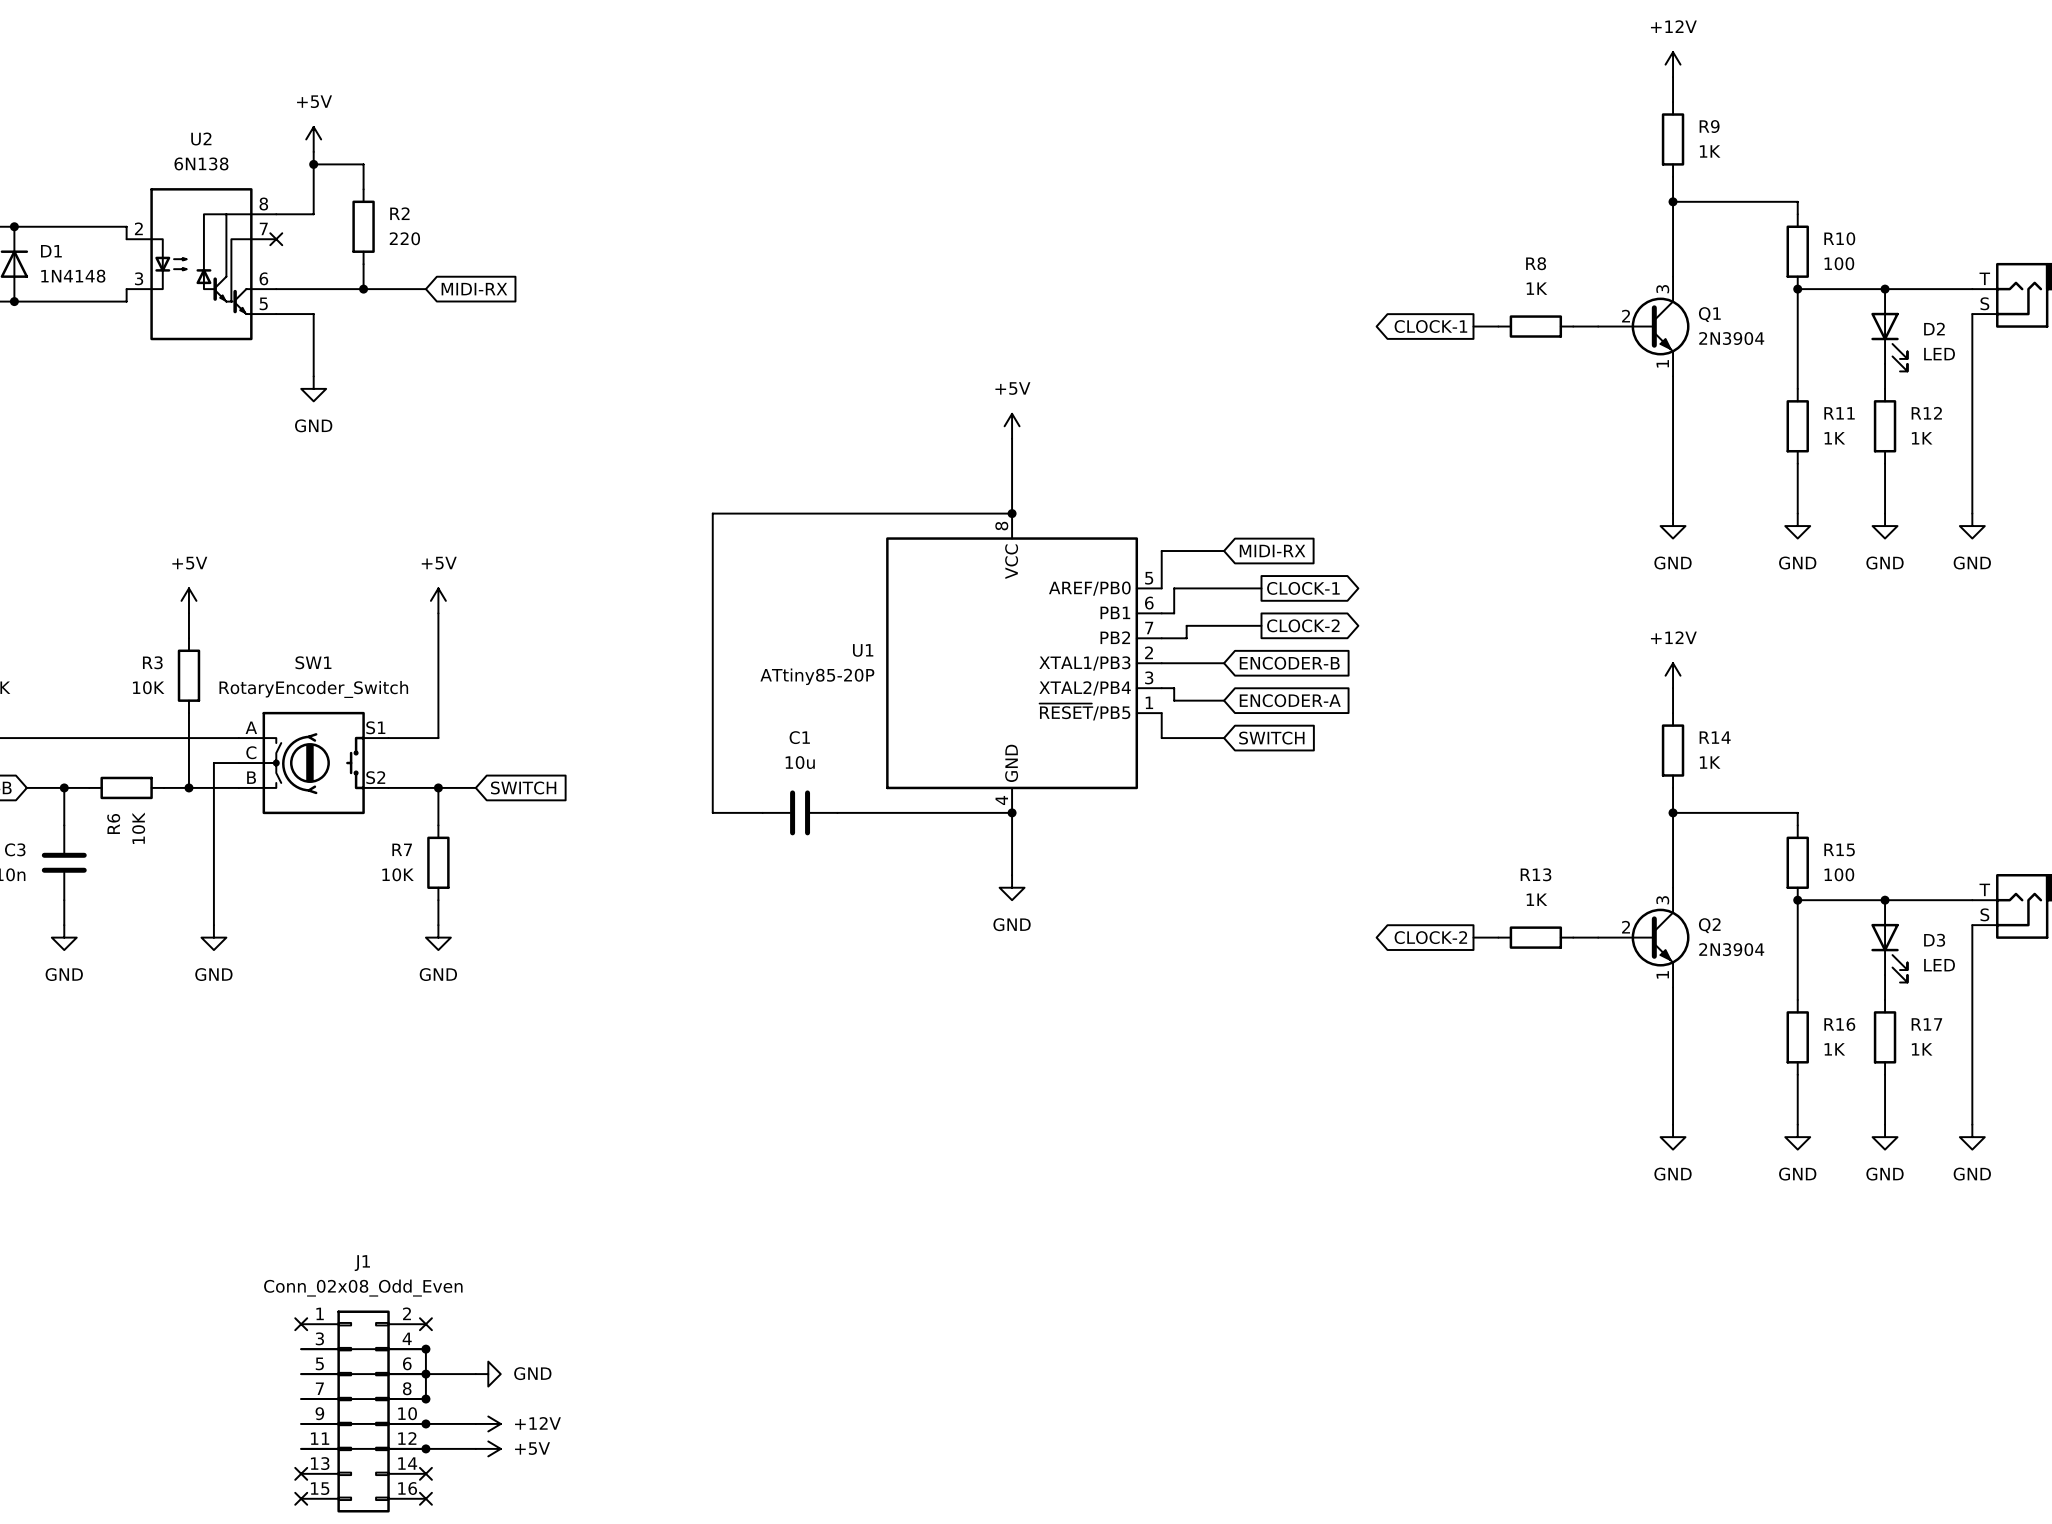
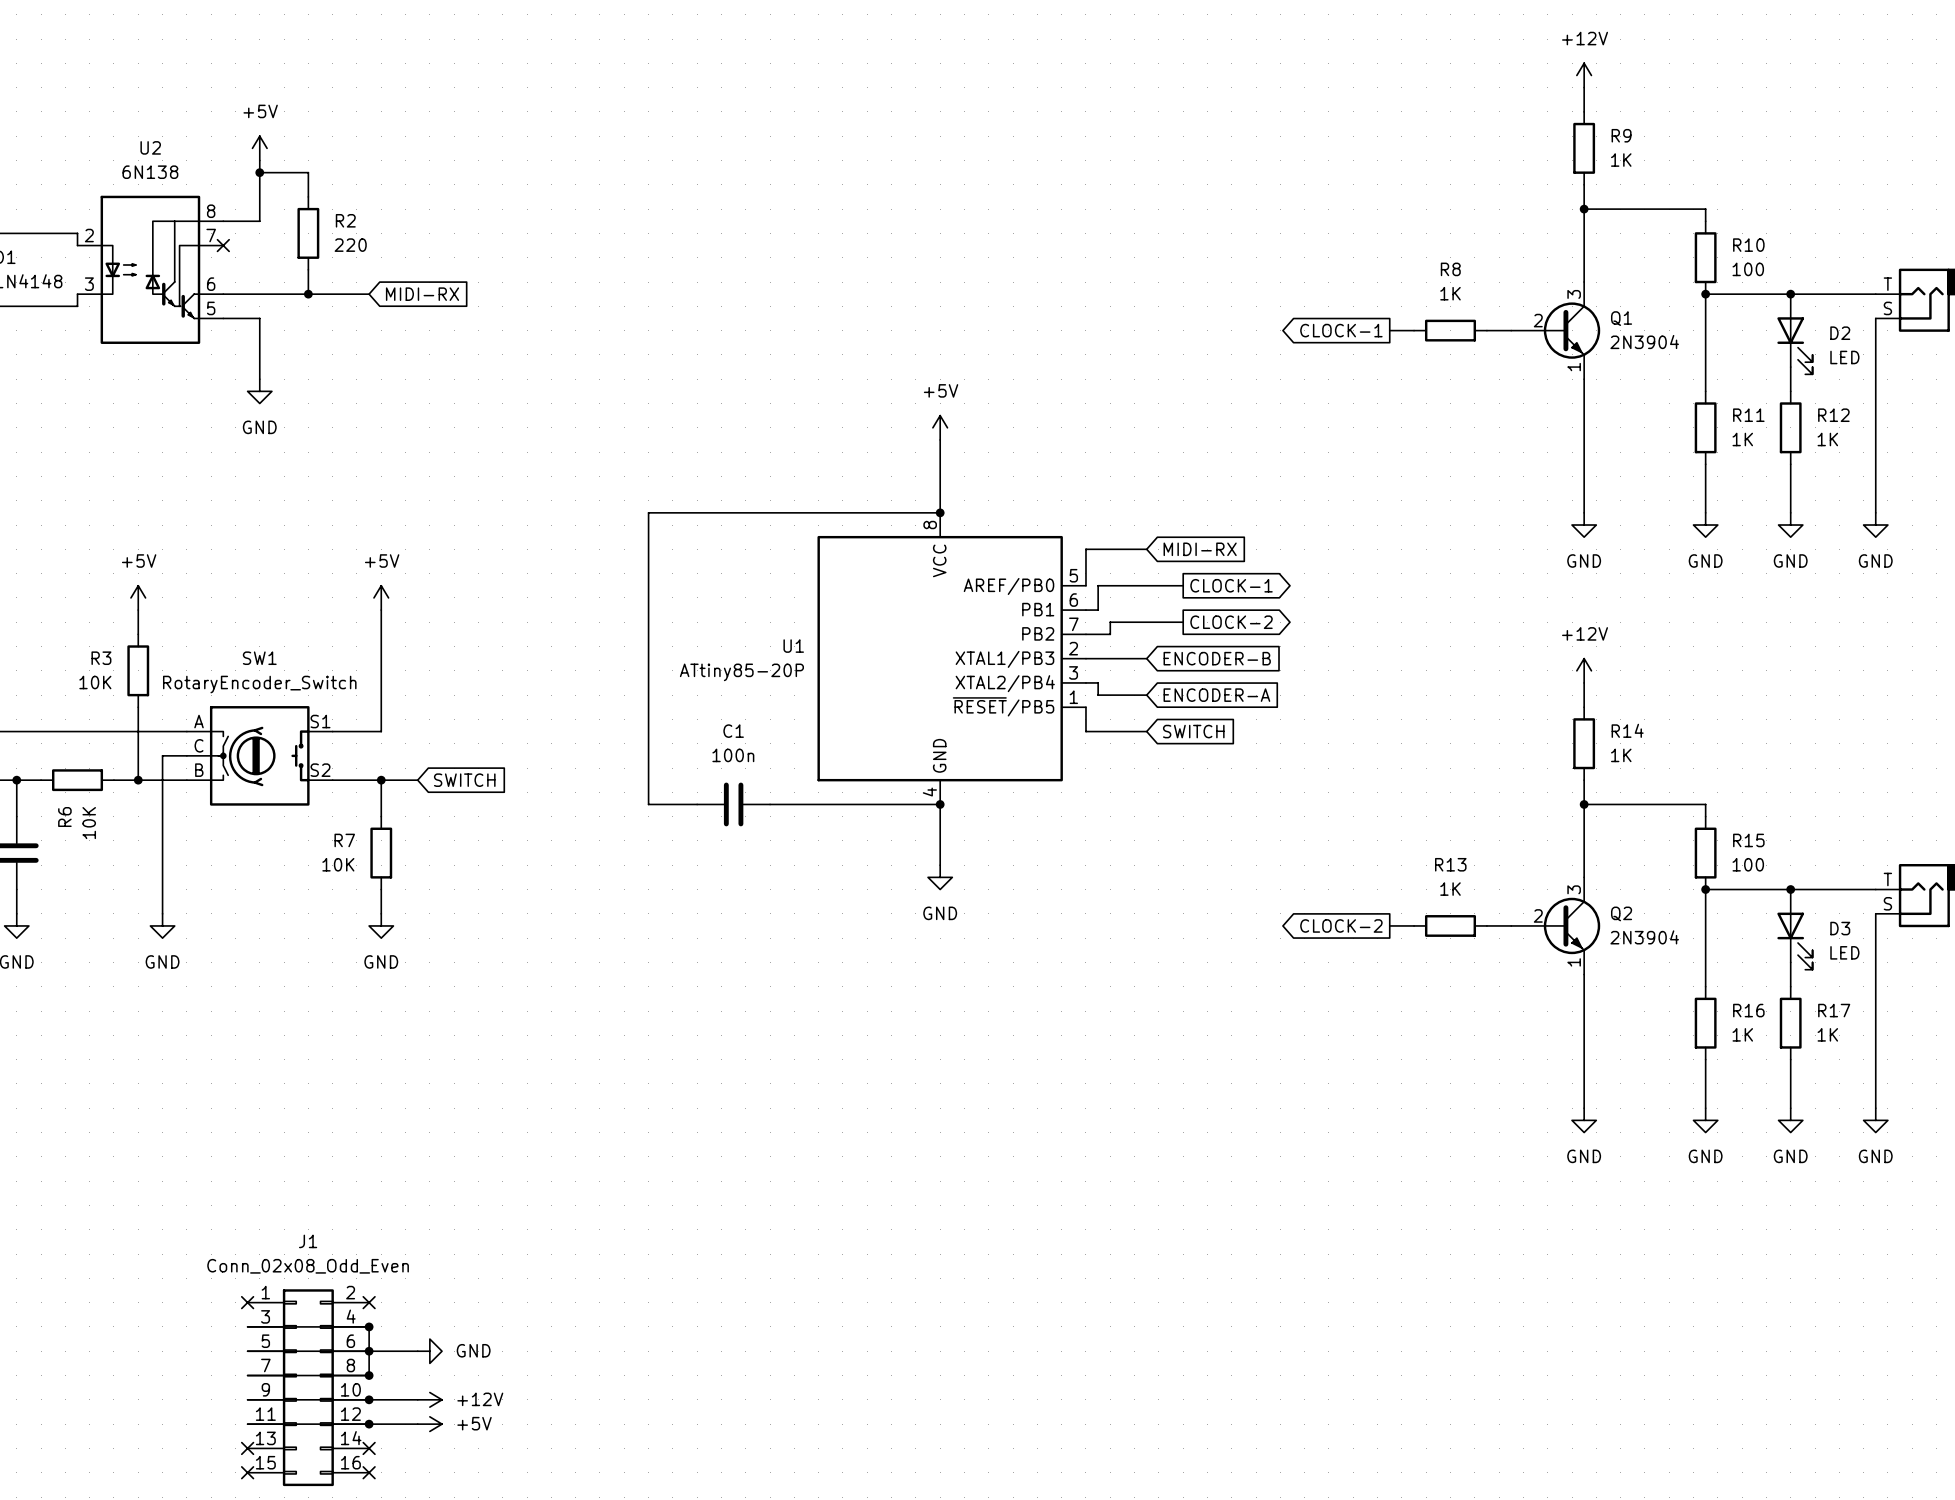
C1 value: 10u (800, 762) -> 100n (733, 755)

